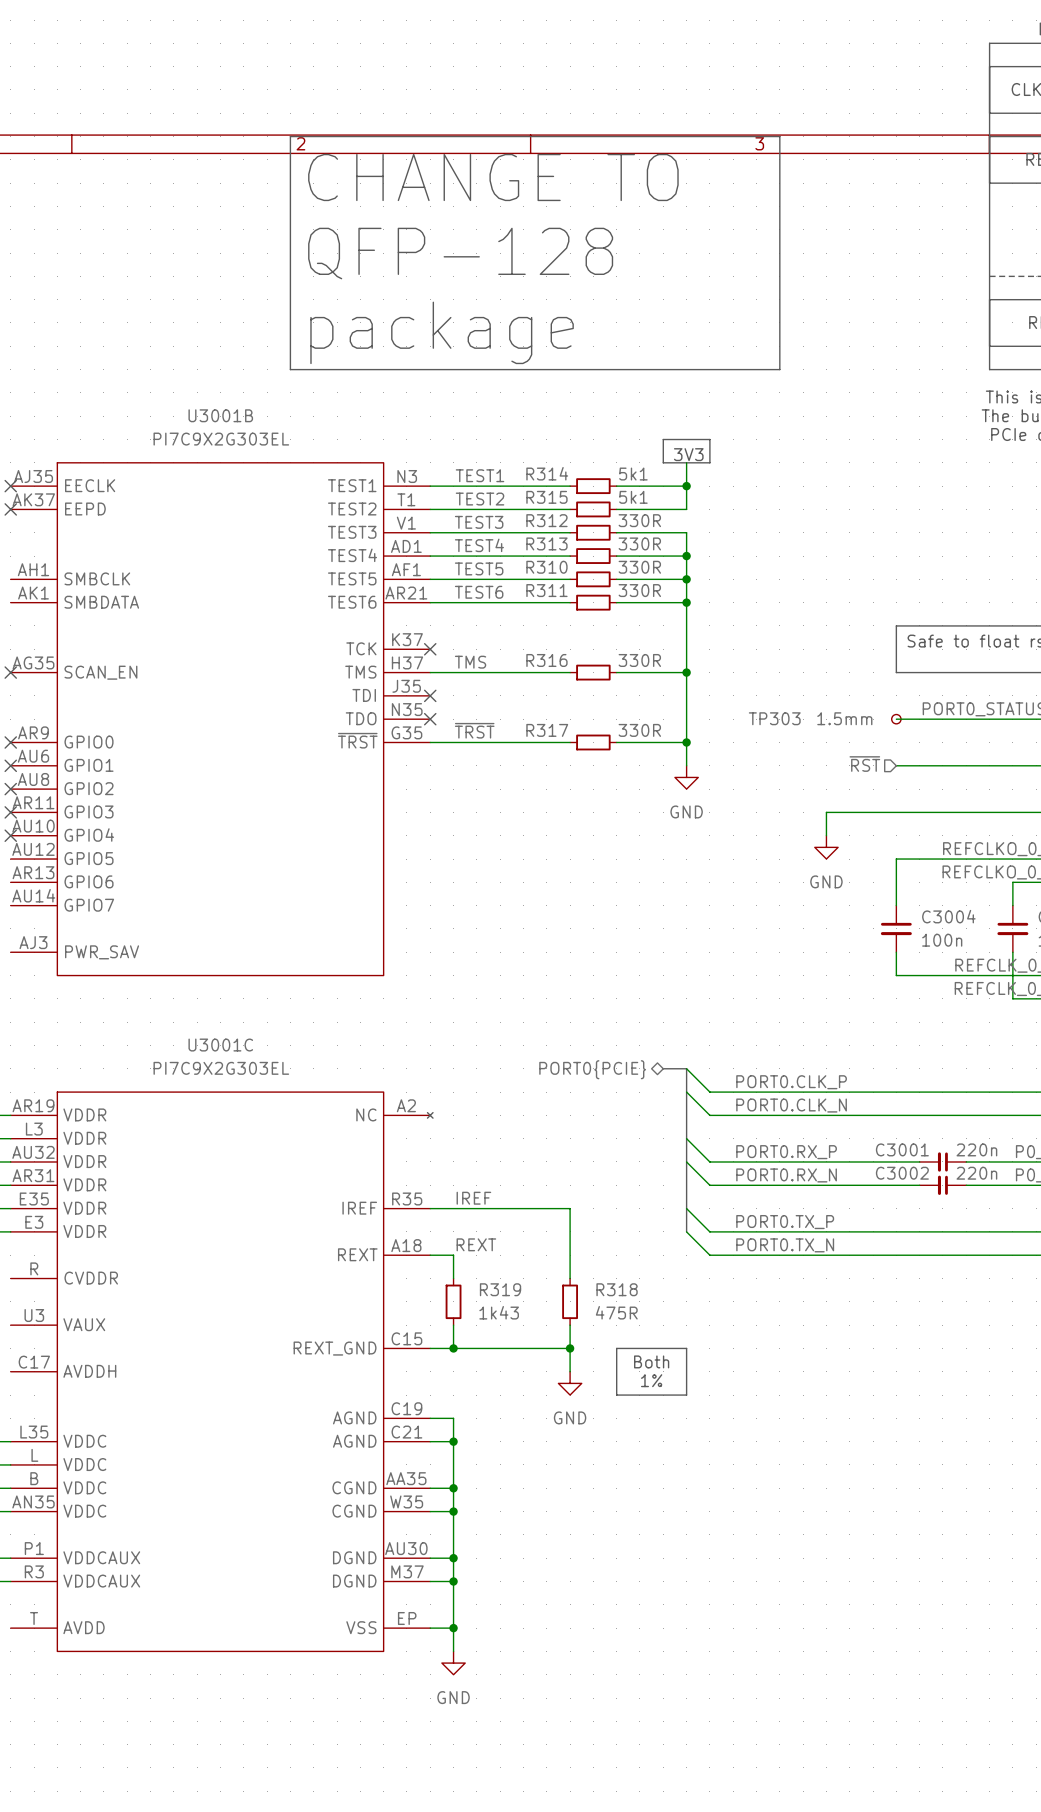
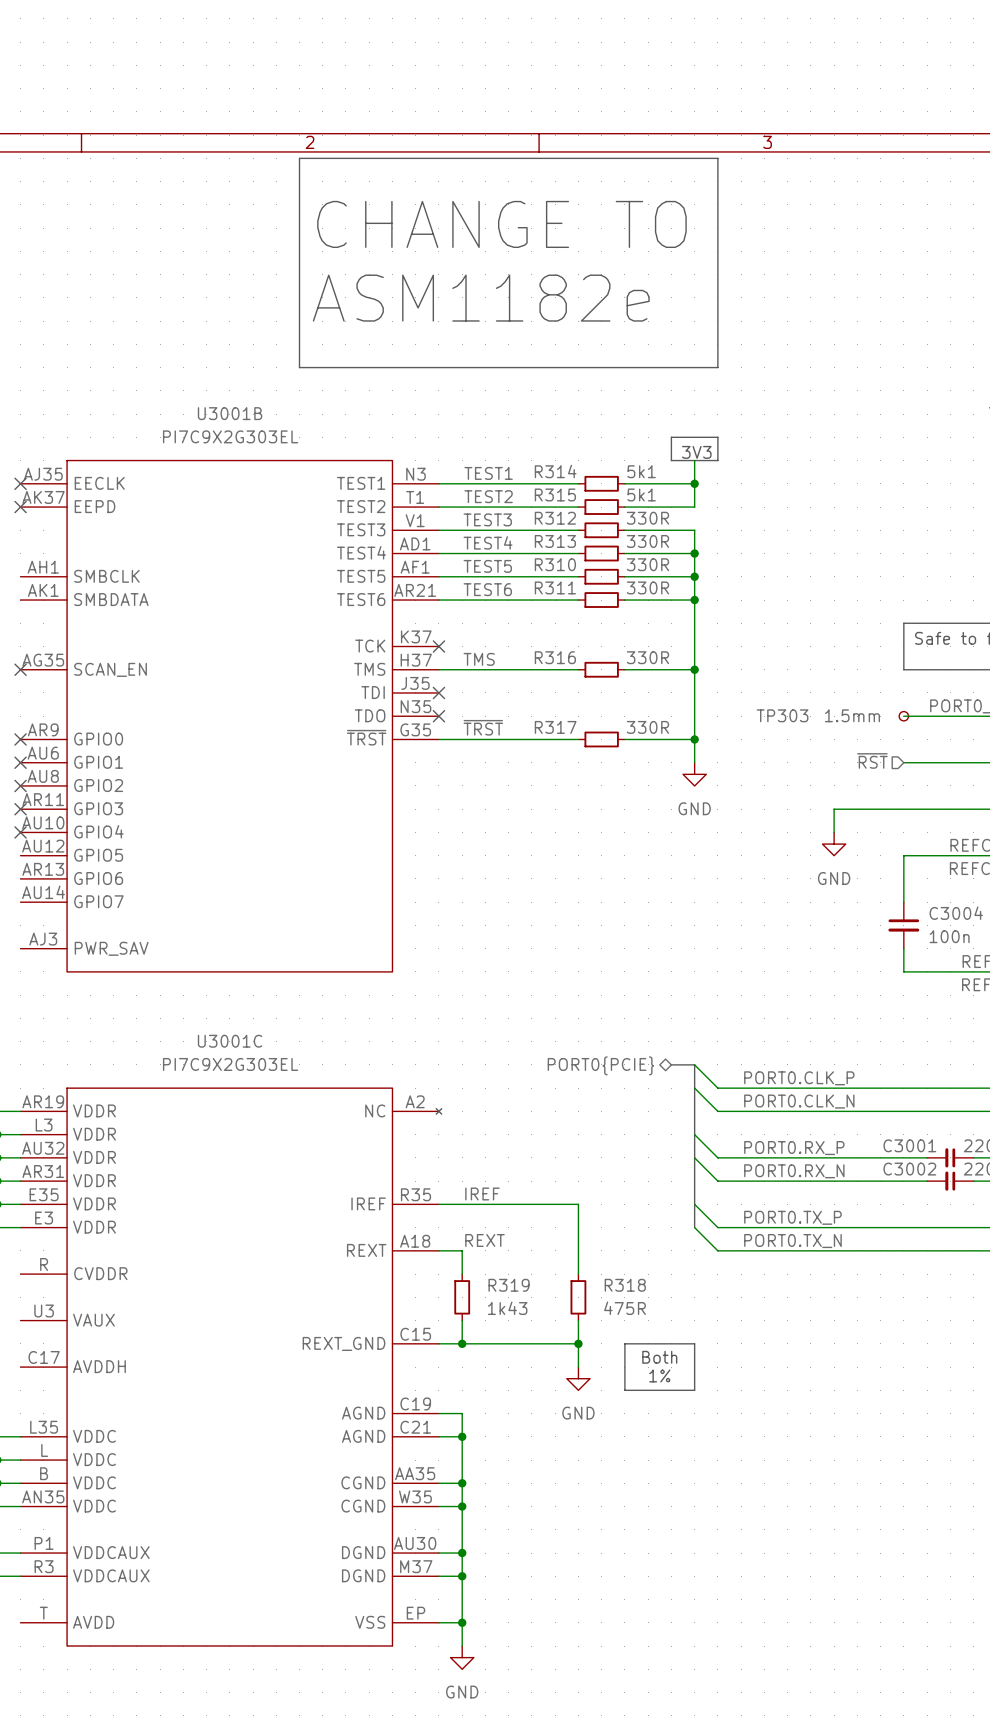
line: (290, 159) (290, 136) (779, 136) (779, 369) (709, 369) -> (299, 158) (717, 158) (717, 367)
text position: CHANGE TO (493, 177) -> CHANGE TO (501, 224)
text: QFP-128 (460, 253) -> none
text: none -> ASM1182e (481, 298)
text: package (442, 332) -> none

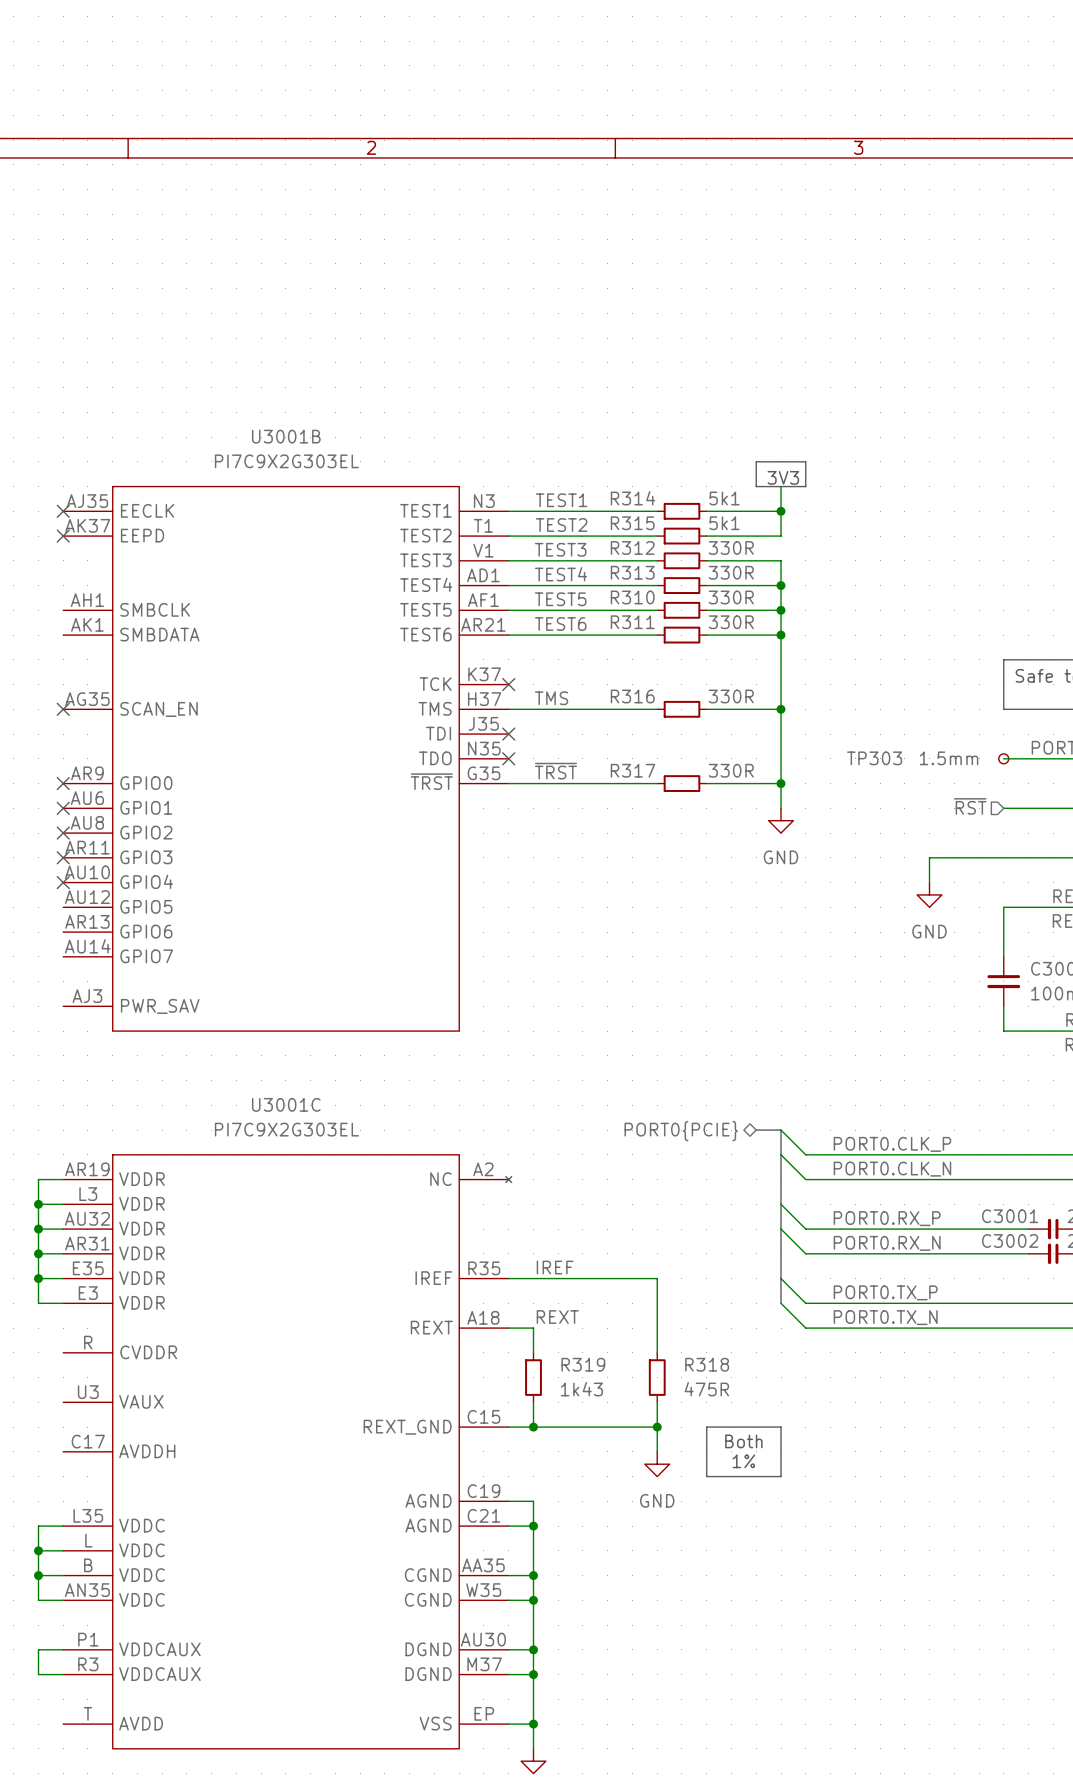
line: (299, 158) (717, 158) (717, 367) (299, 367) (299, 158) -> none
text: CHANGE TO (501, 224) -> none
text: ASM1182e (481, 298) -> none

